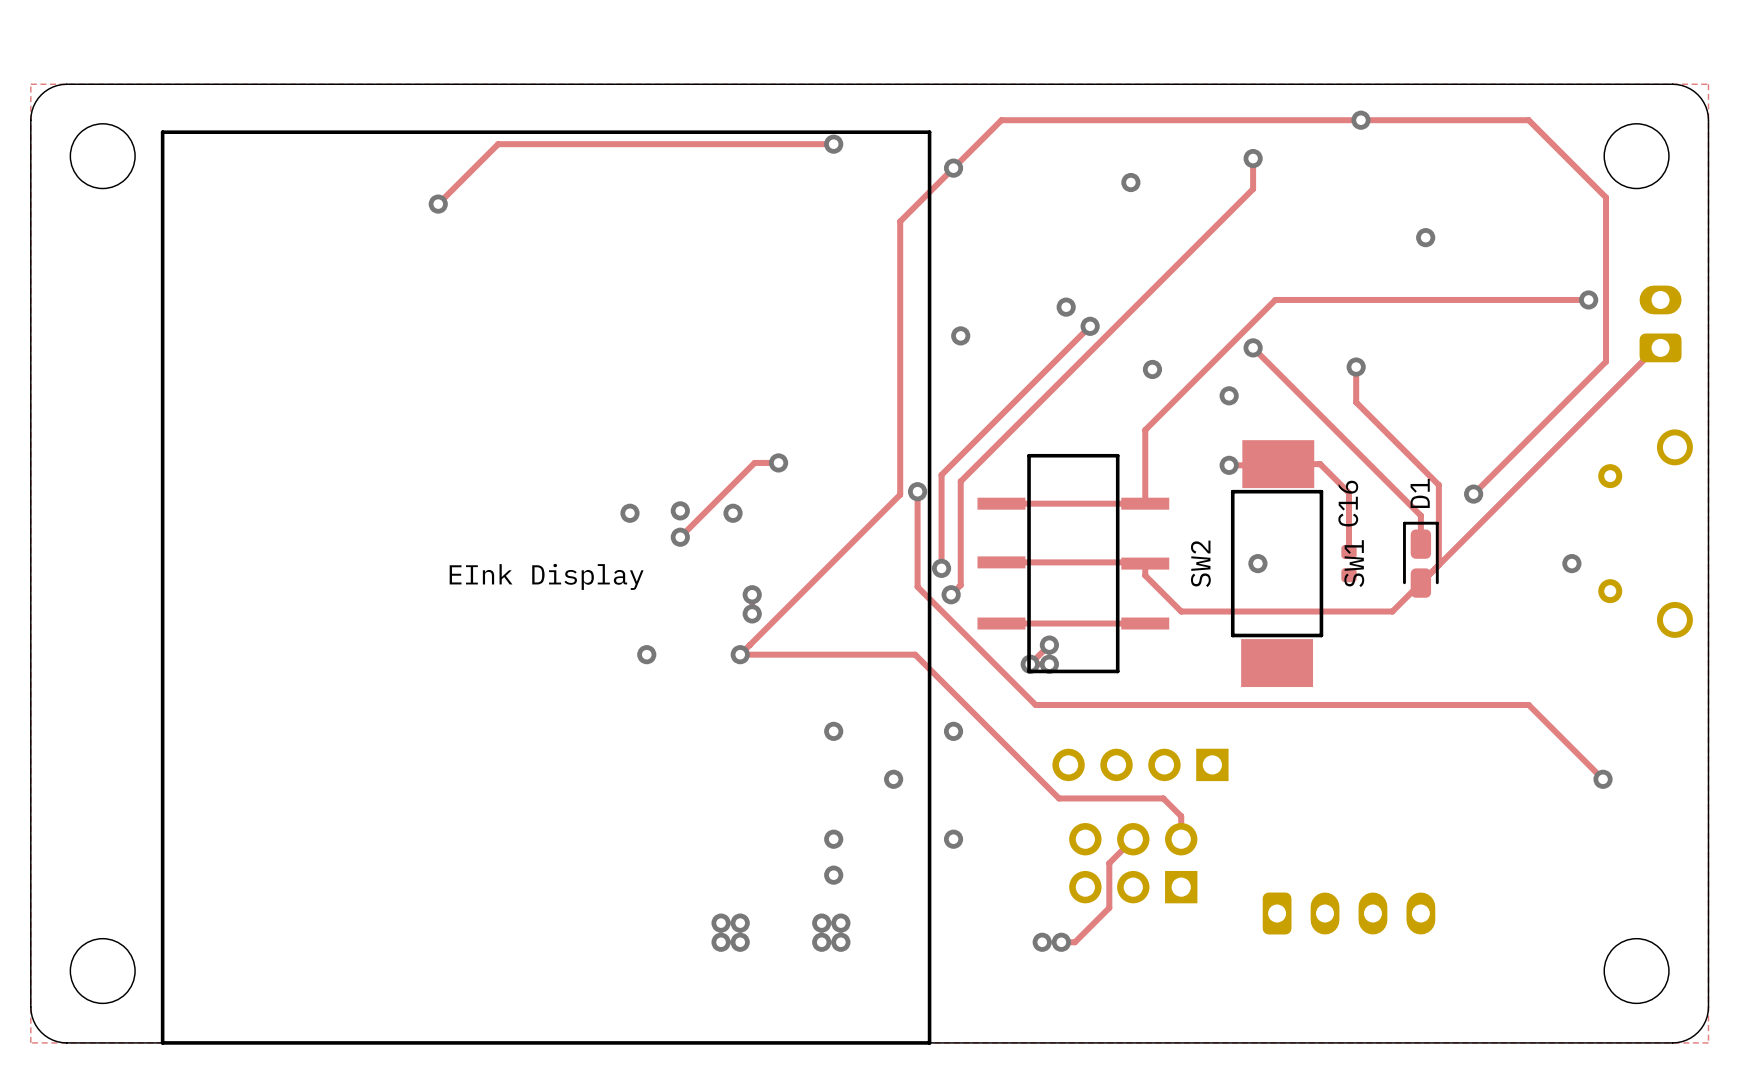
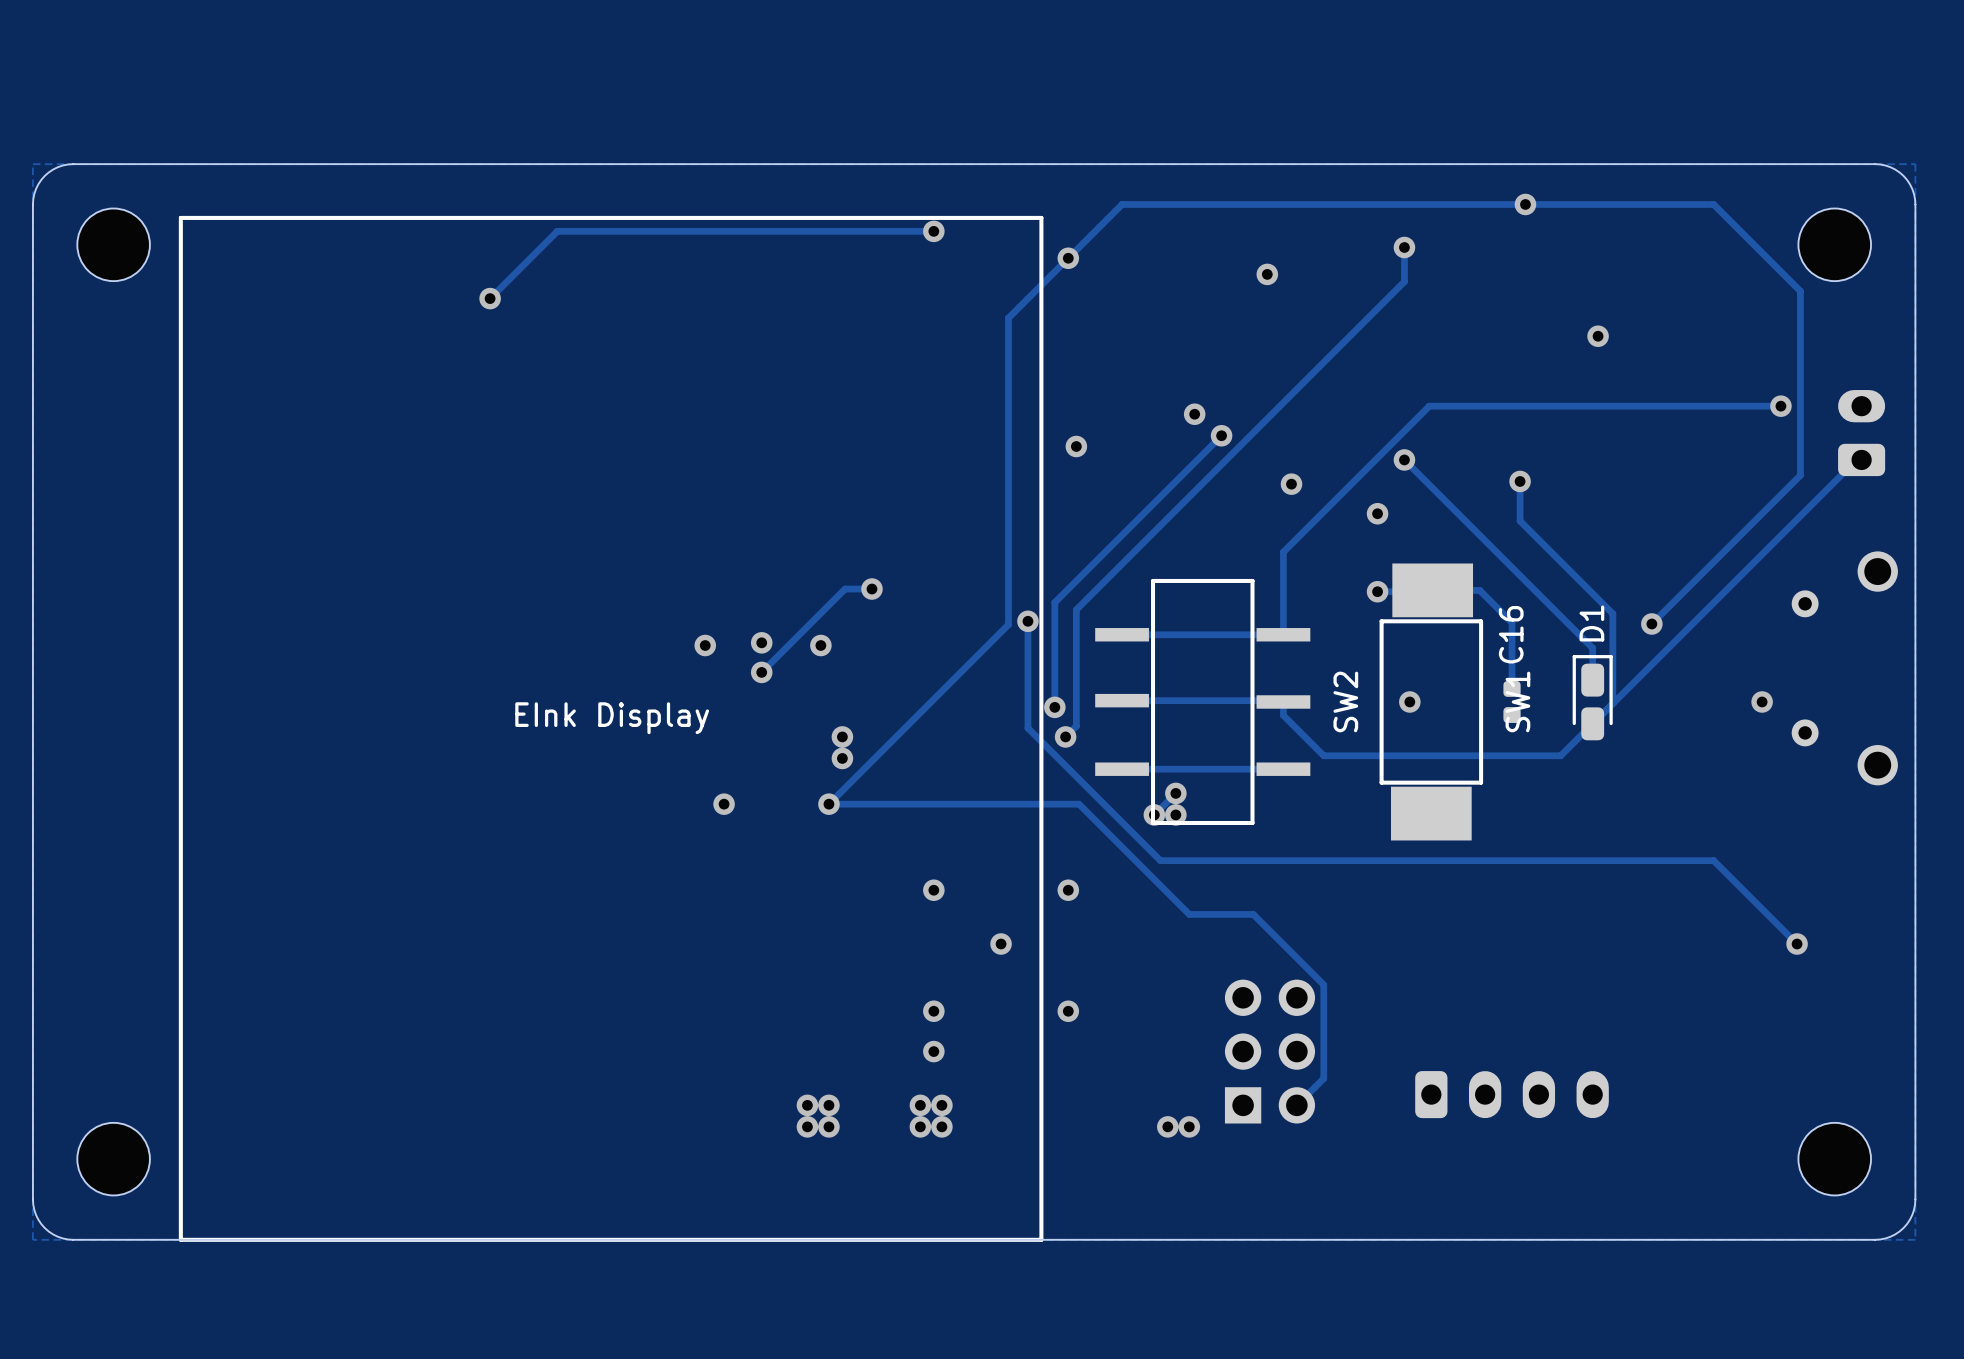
track: (915, 654) (1058, 798) (1163, 798) (1181, 816) -> (1025, 804) (1079, 804) (1189, 914) (1253, 914) (1323, 985)
part: (1140, 764) -> none
track: (1133, 839) (1109, 863) (1109, 907) (1074, 942) (1061, 942) -> none
track: none -> (1323, 1011) (1323, 1078) (1296, 1105)
part rotation: 0° (1133, 863) -> 90° clockwise (1269, 1051)

